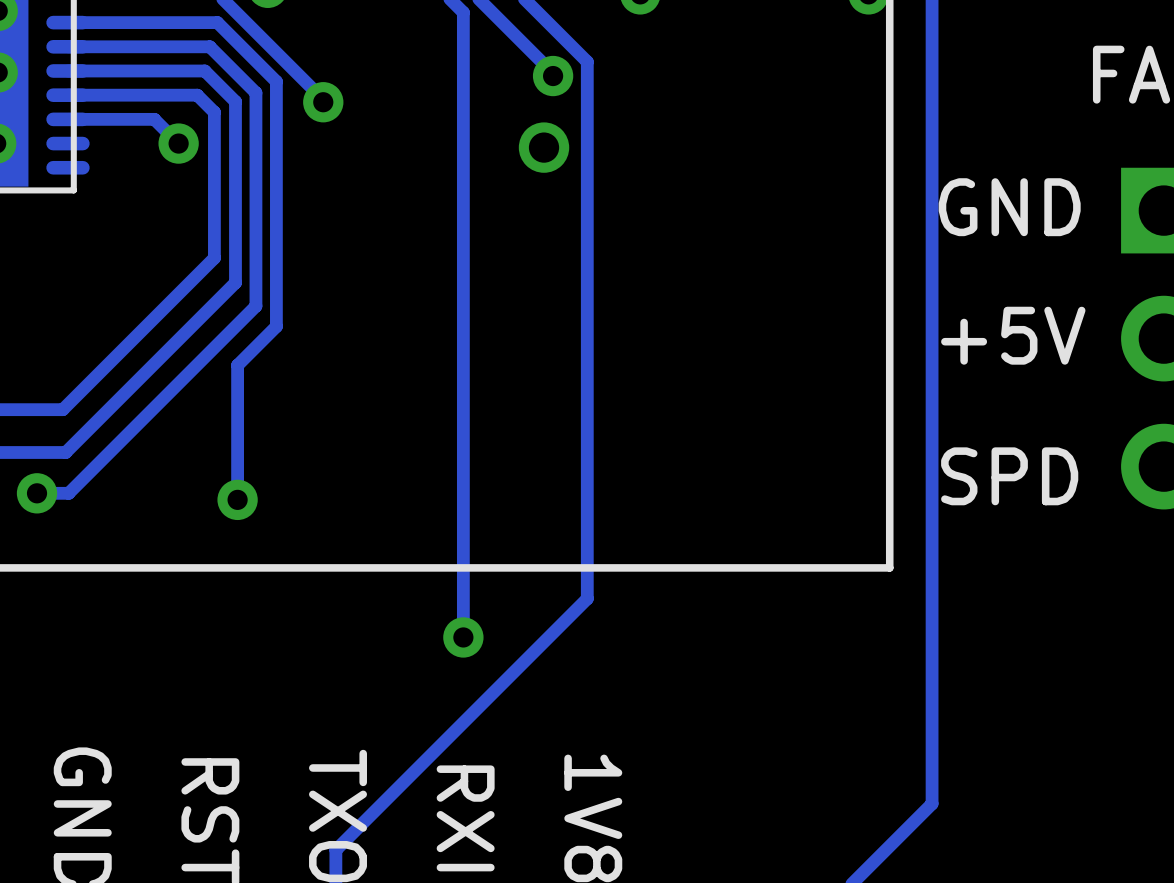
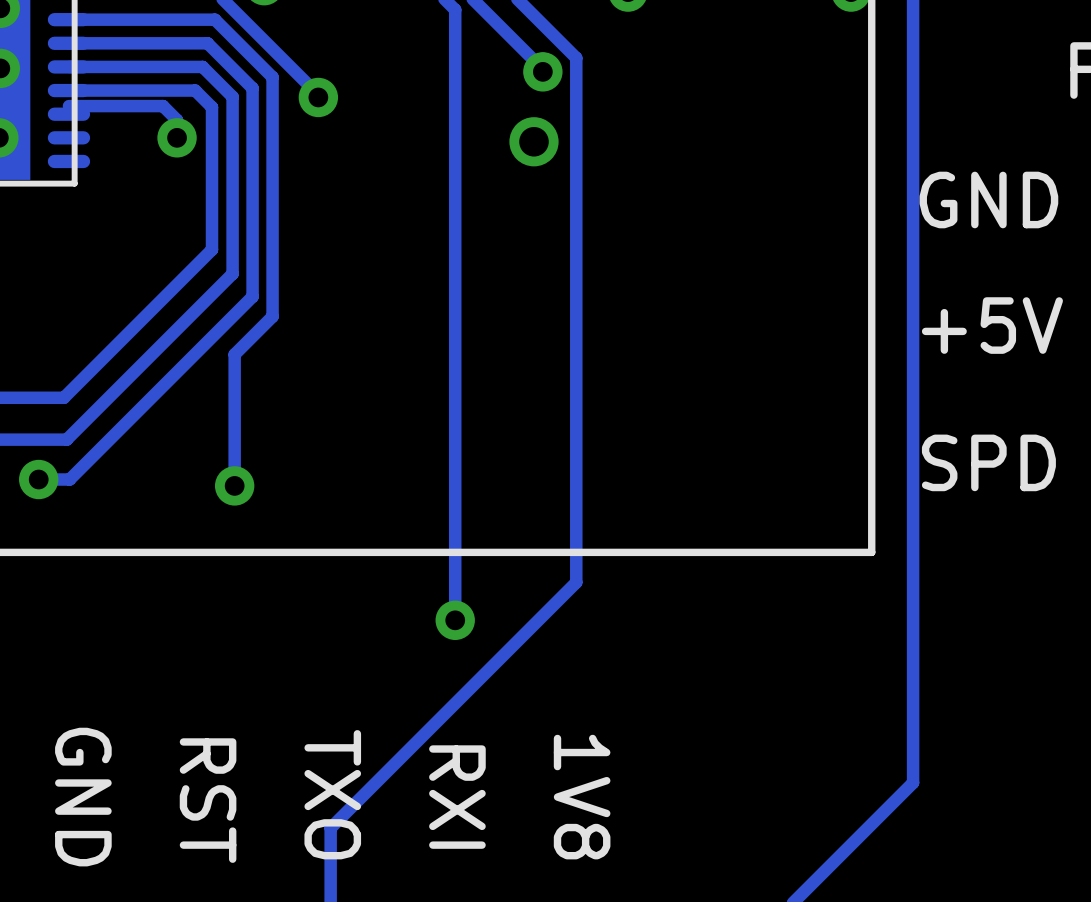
track: (67, 119) (154, 119) (178, 143) -> (68, 106) (163, 106) (177, 120) (177, 137)

